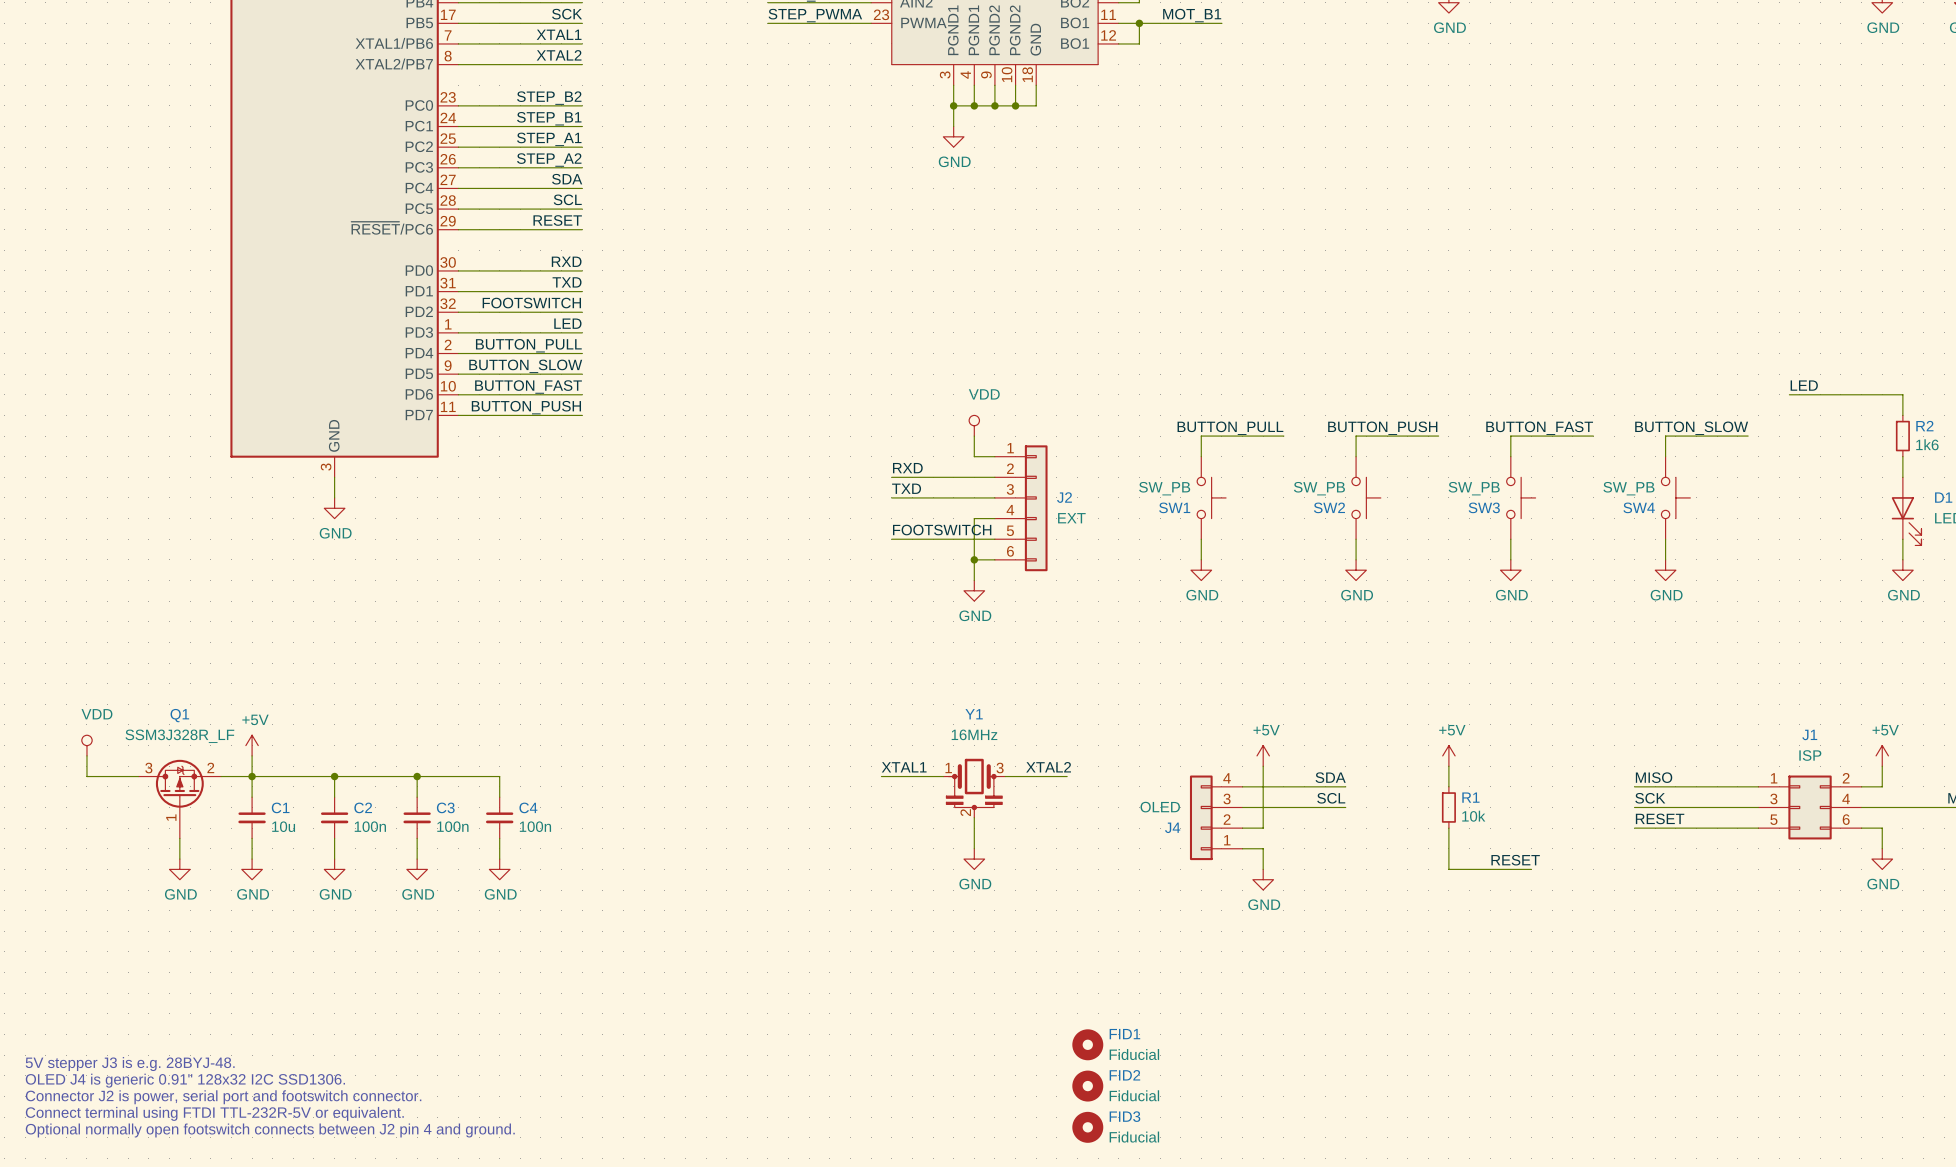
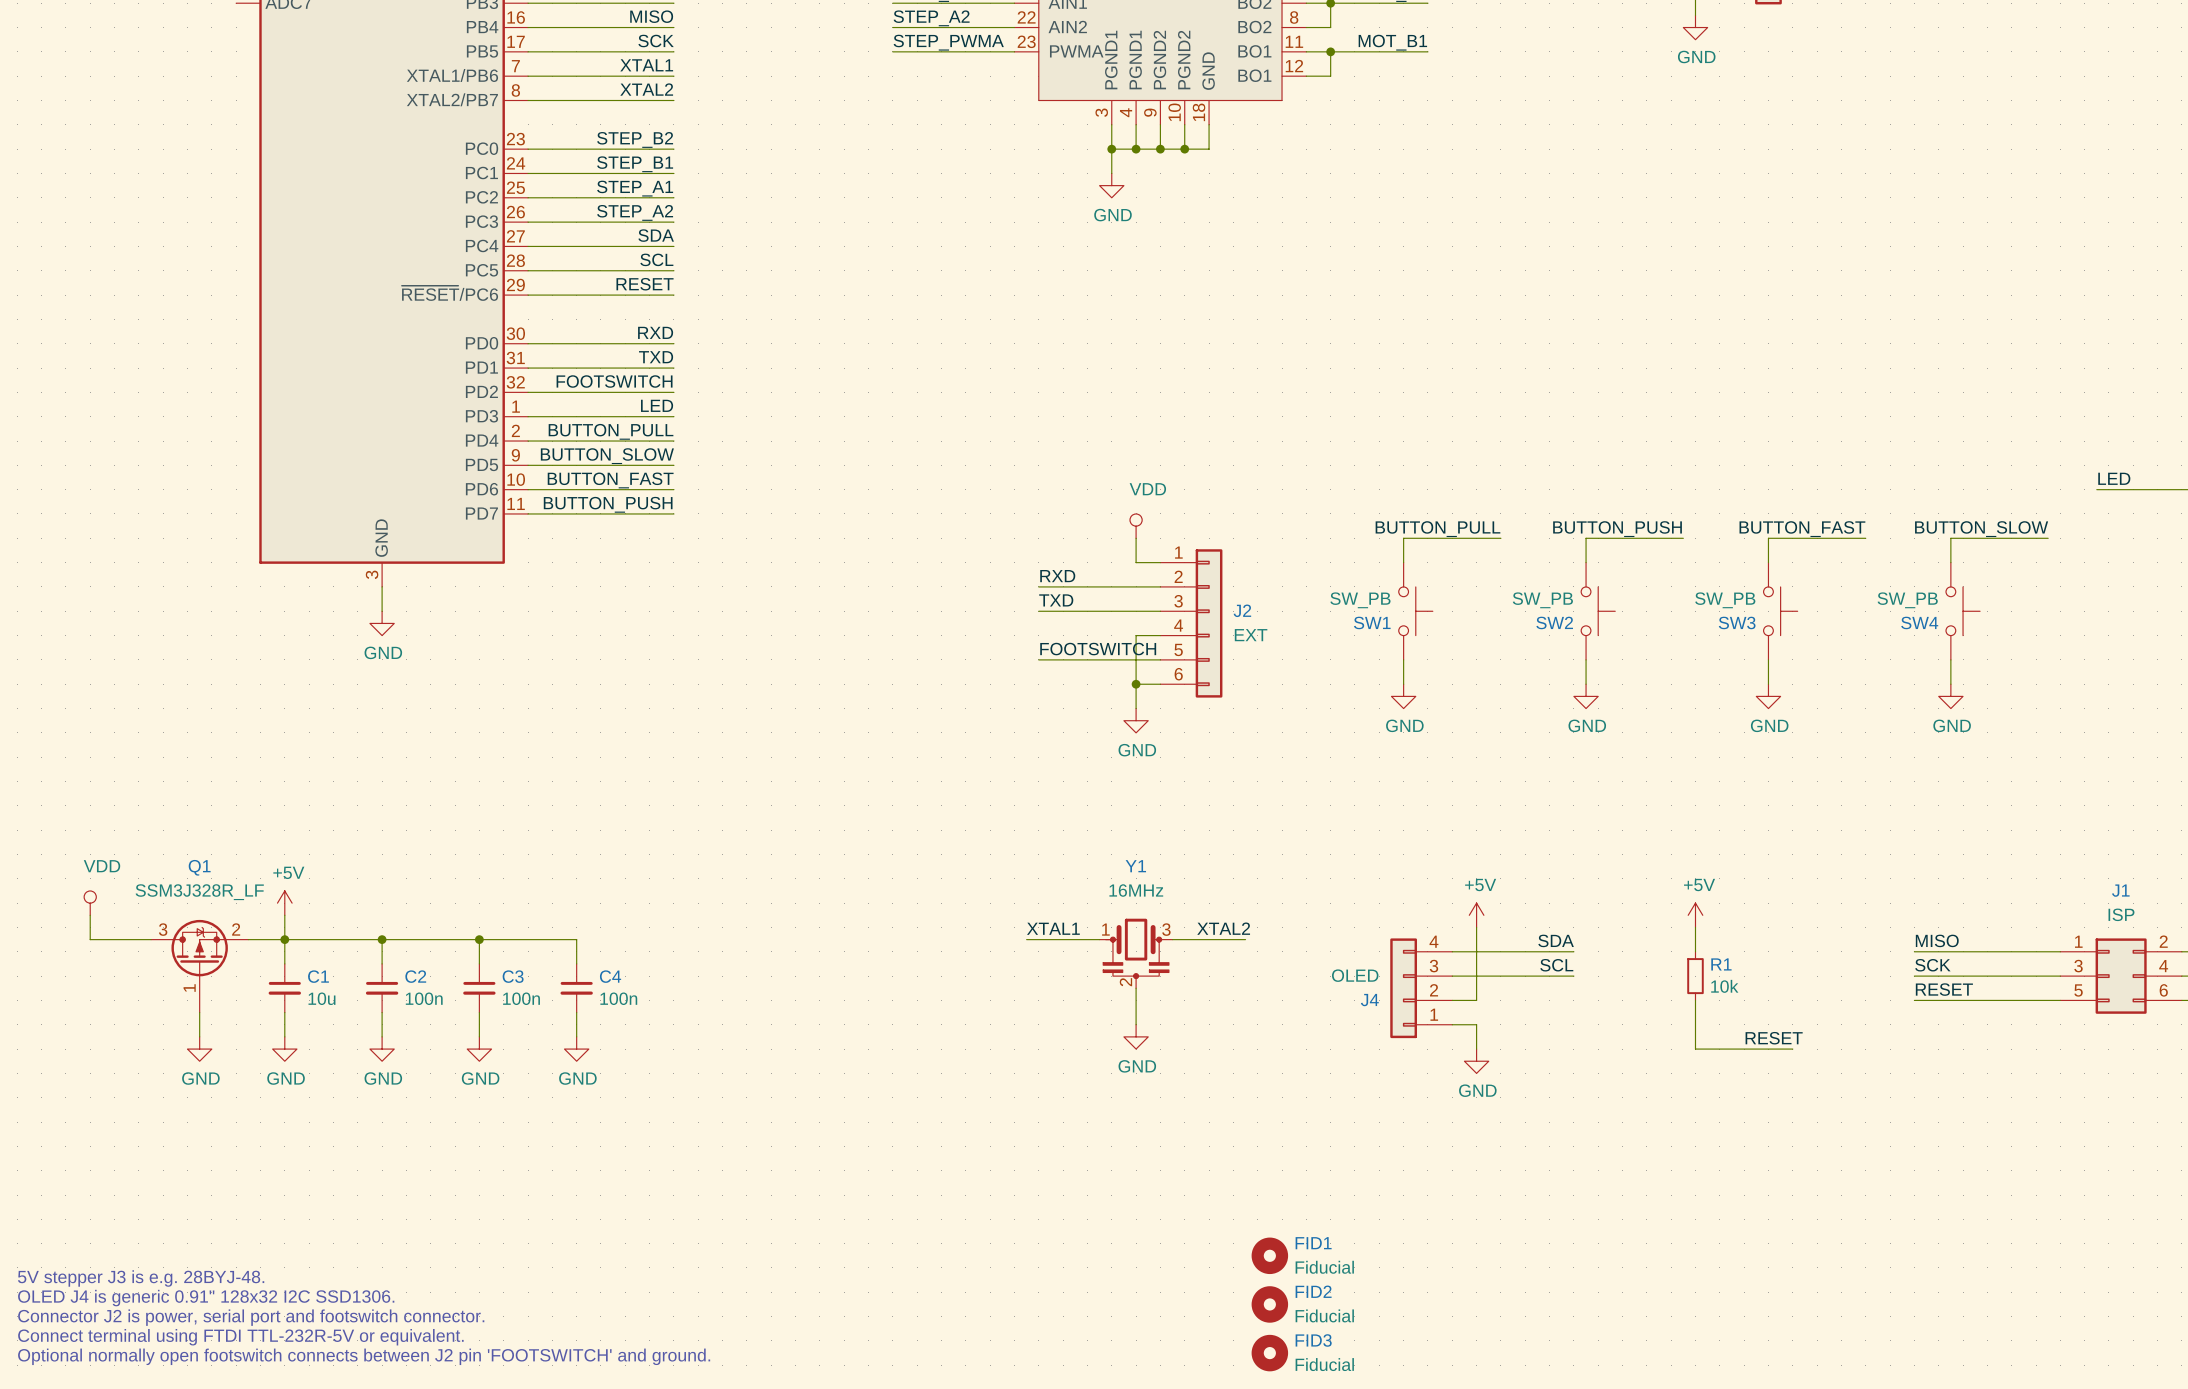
text: Optional normally open footswitch connects between J2 pin 4 and ground. (270, 1130) -> Optional normally open footswitch connects between J2 pin 'FOOTSWITCH' and ground. (364, 1356)

